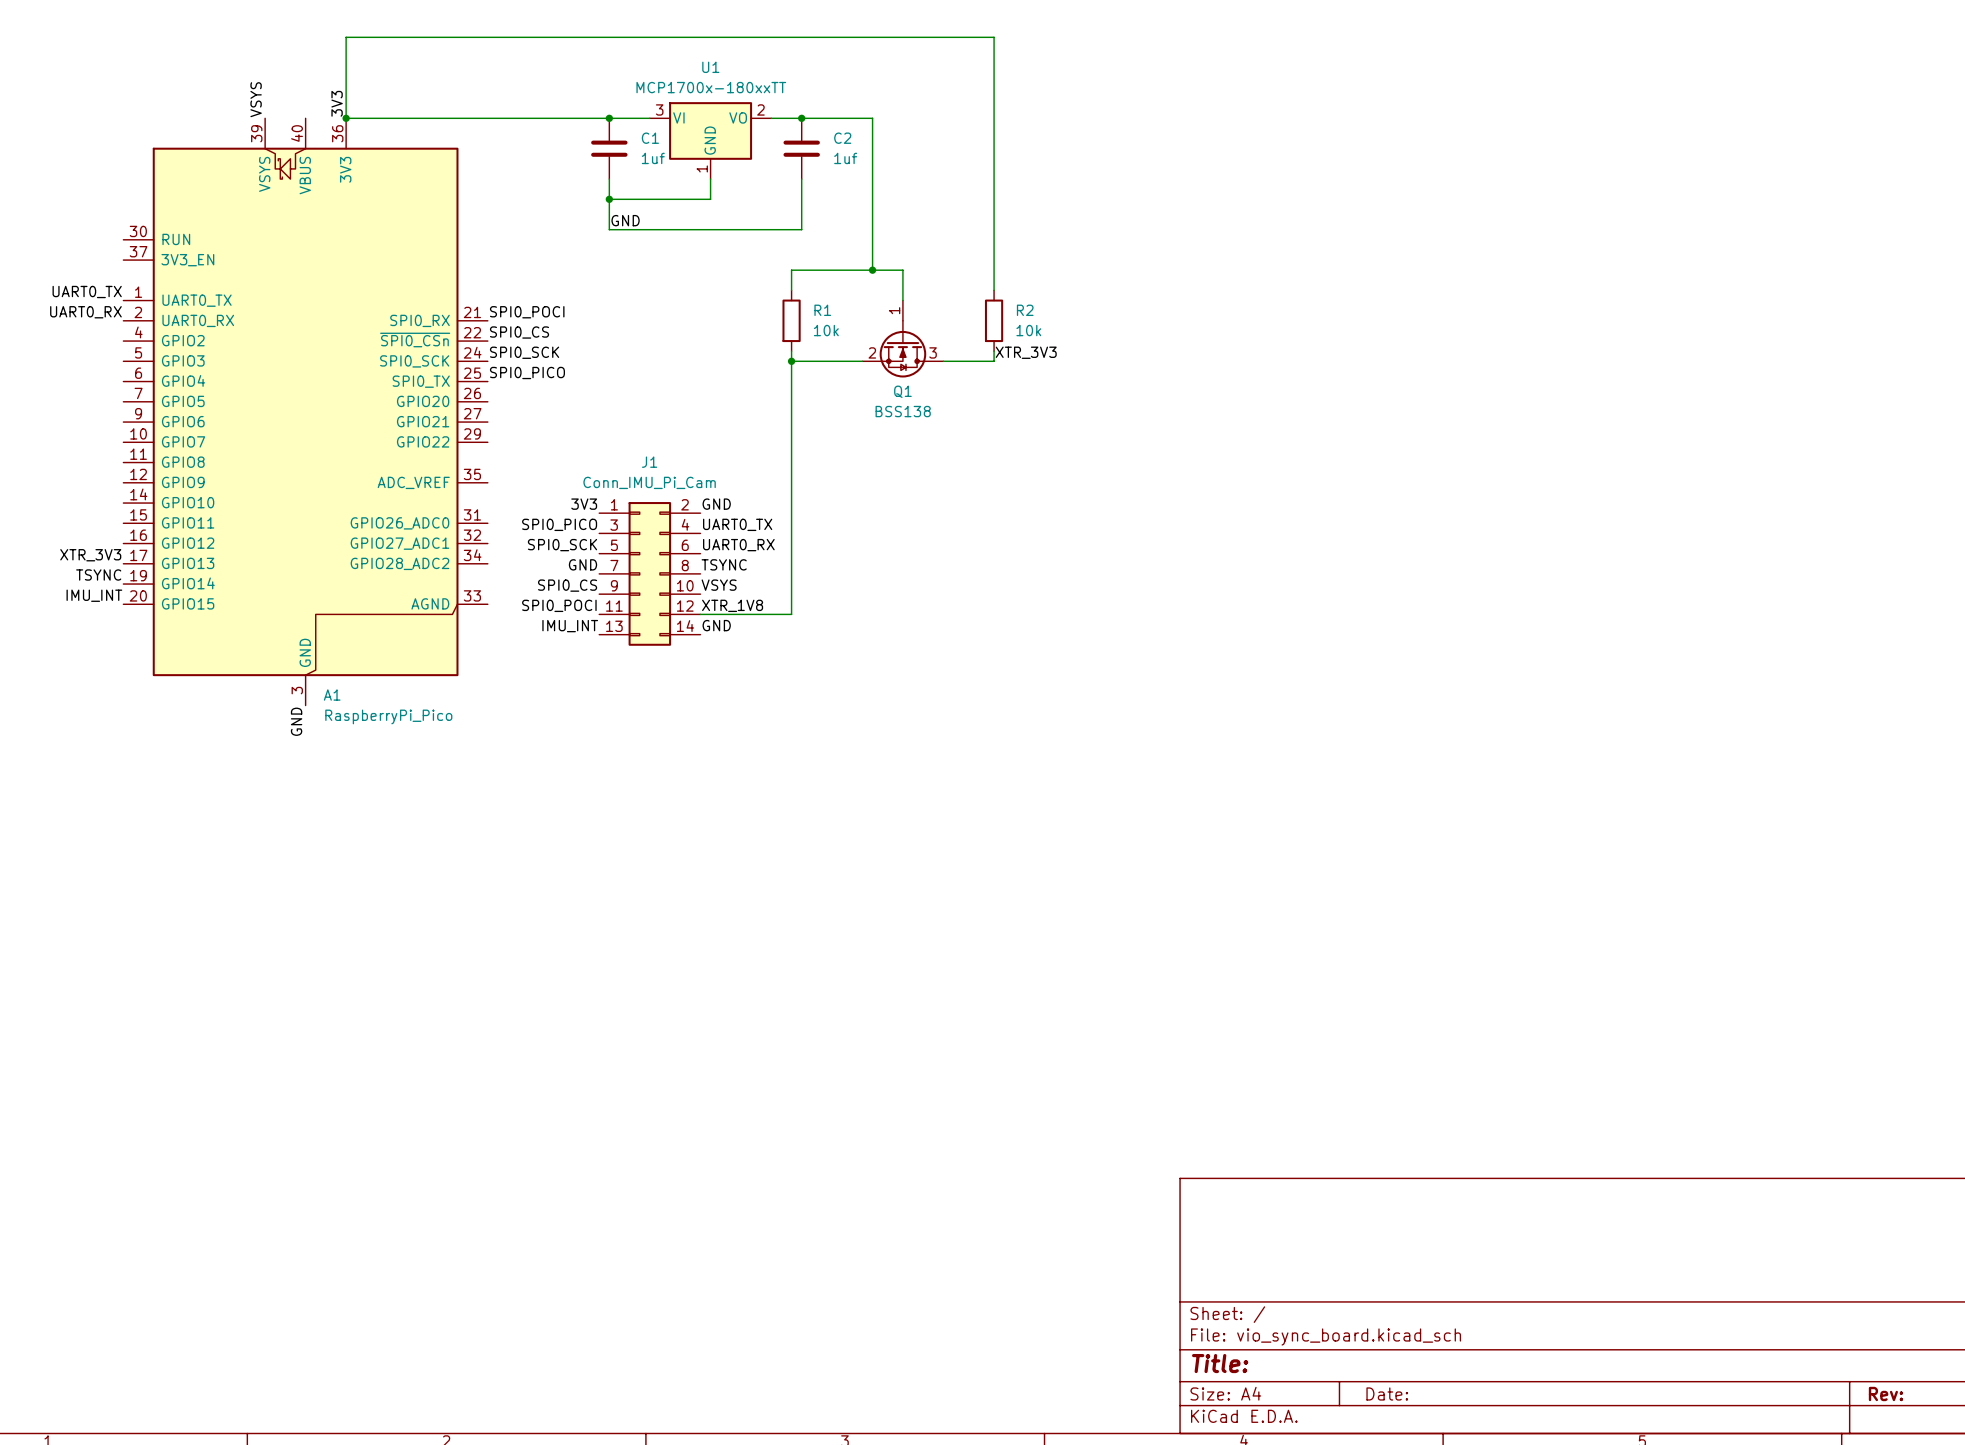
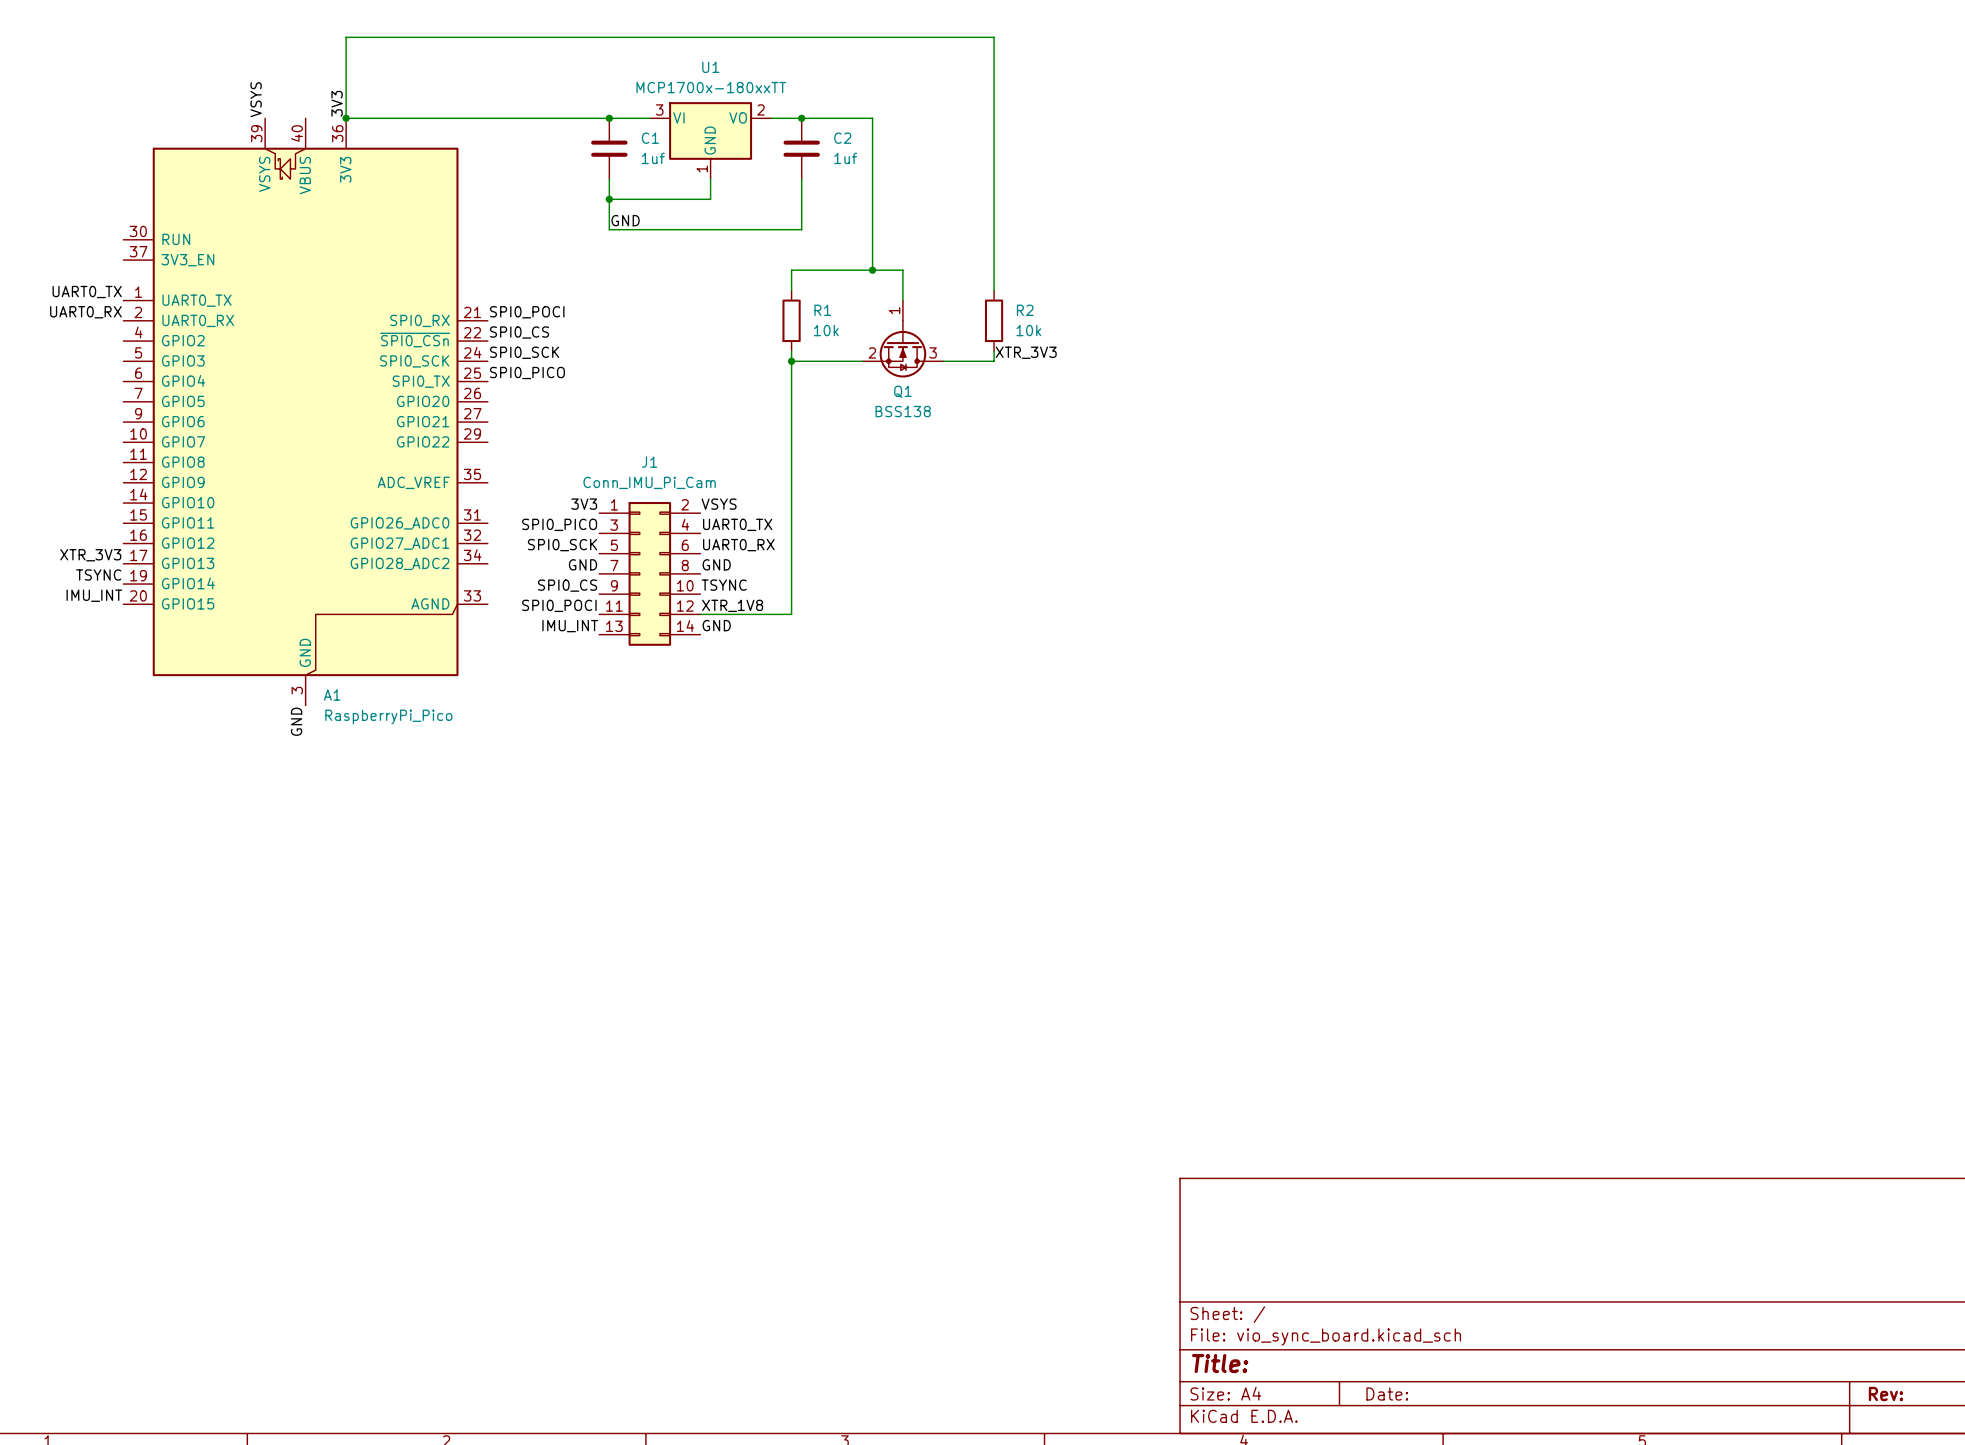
label: GND (716, 504) -> VSYS (719, 504)
label: TSYNC (724, 564) -> GND (716, 564)
label: VSYS (719, 585) -> TSYNC (724, 585)

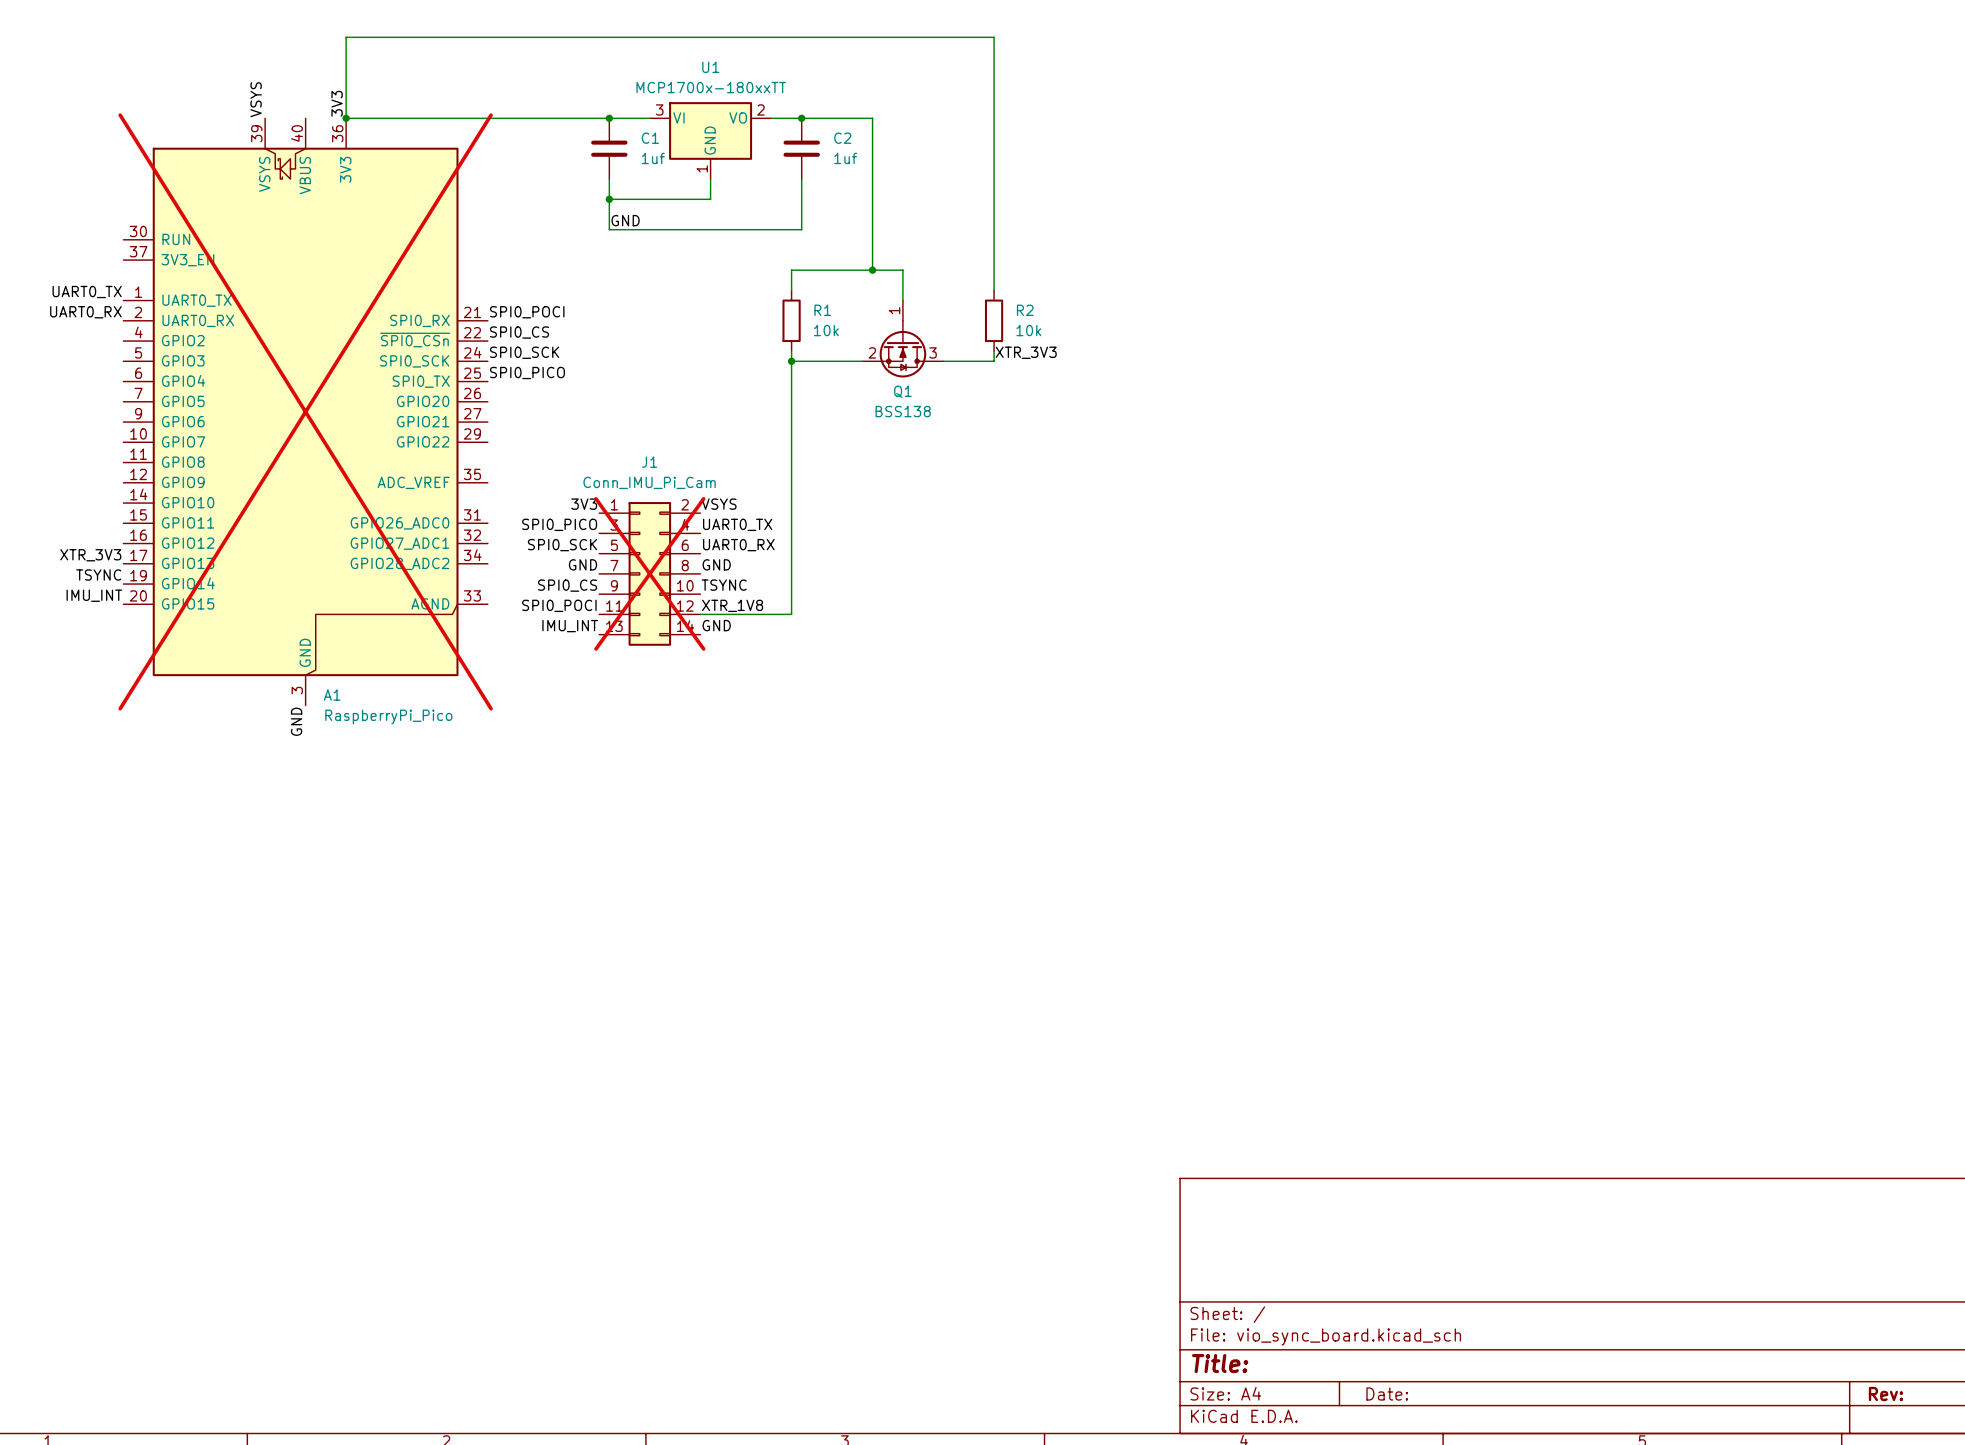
A1 do-not-place cross: none -> (305, 411)
J1 do-not-place cross: none -> (649, 573)

